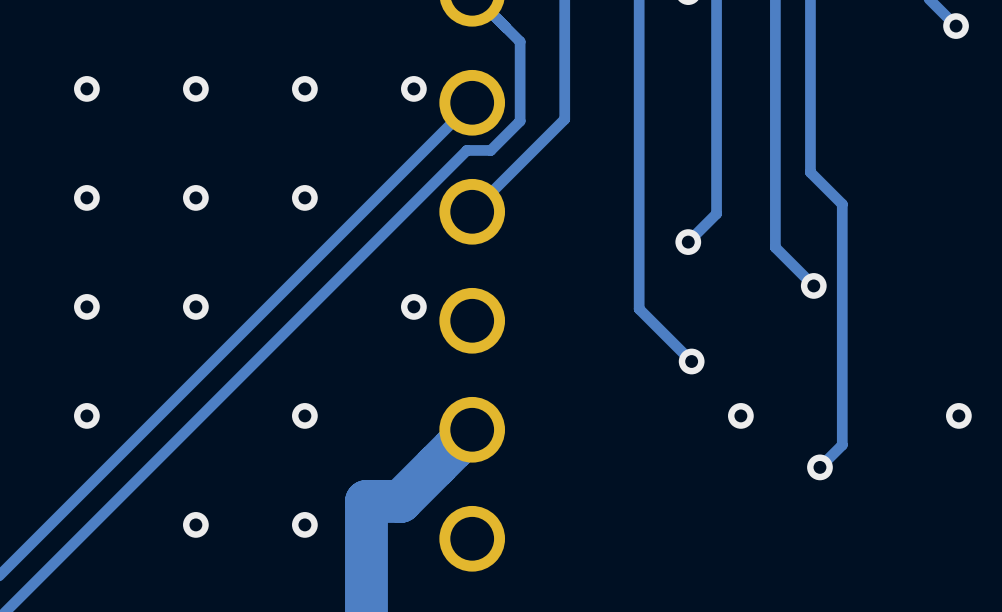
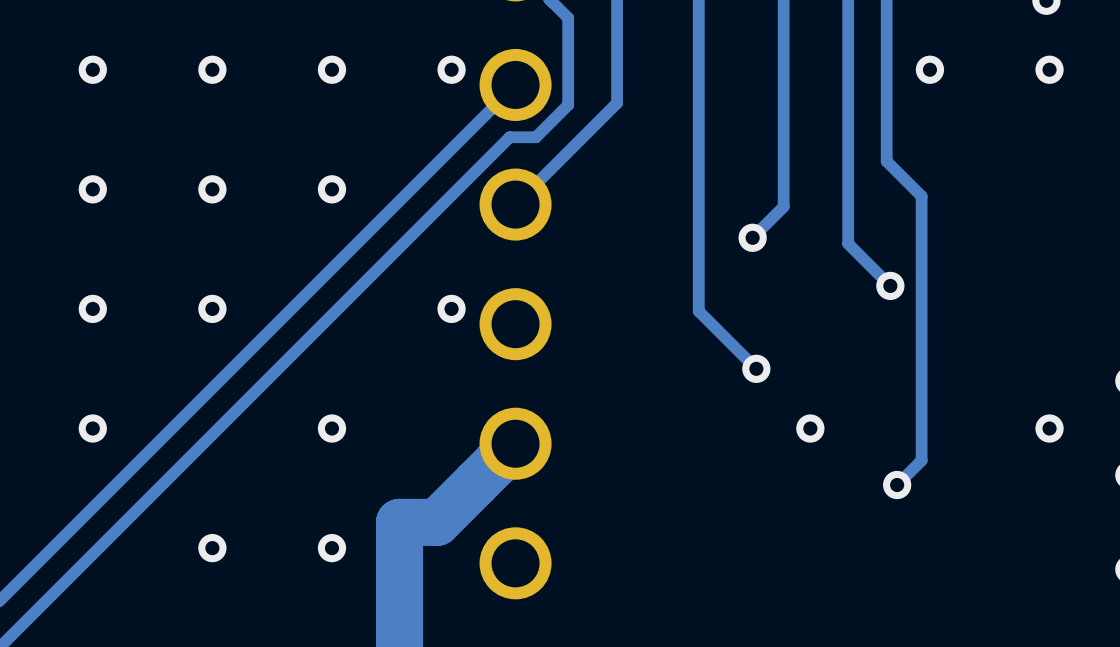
via: none -> (929, 69)
via: none -> (1049, 69)

